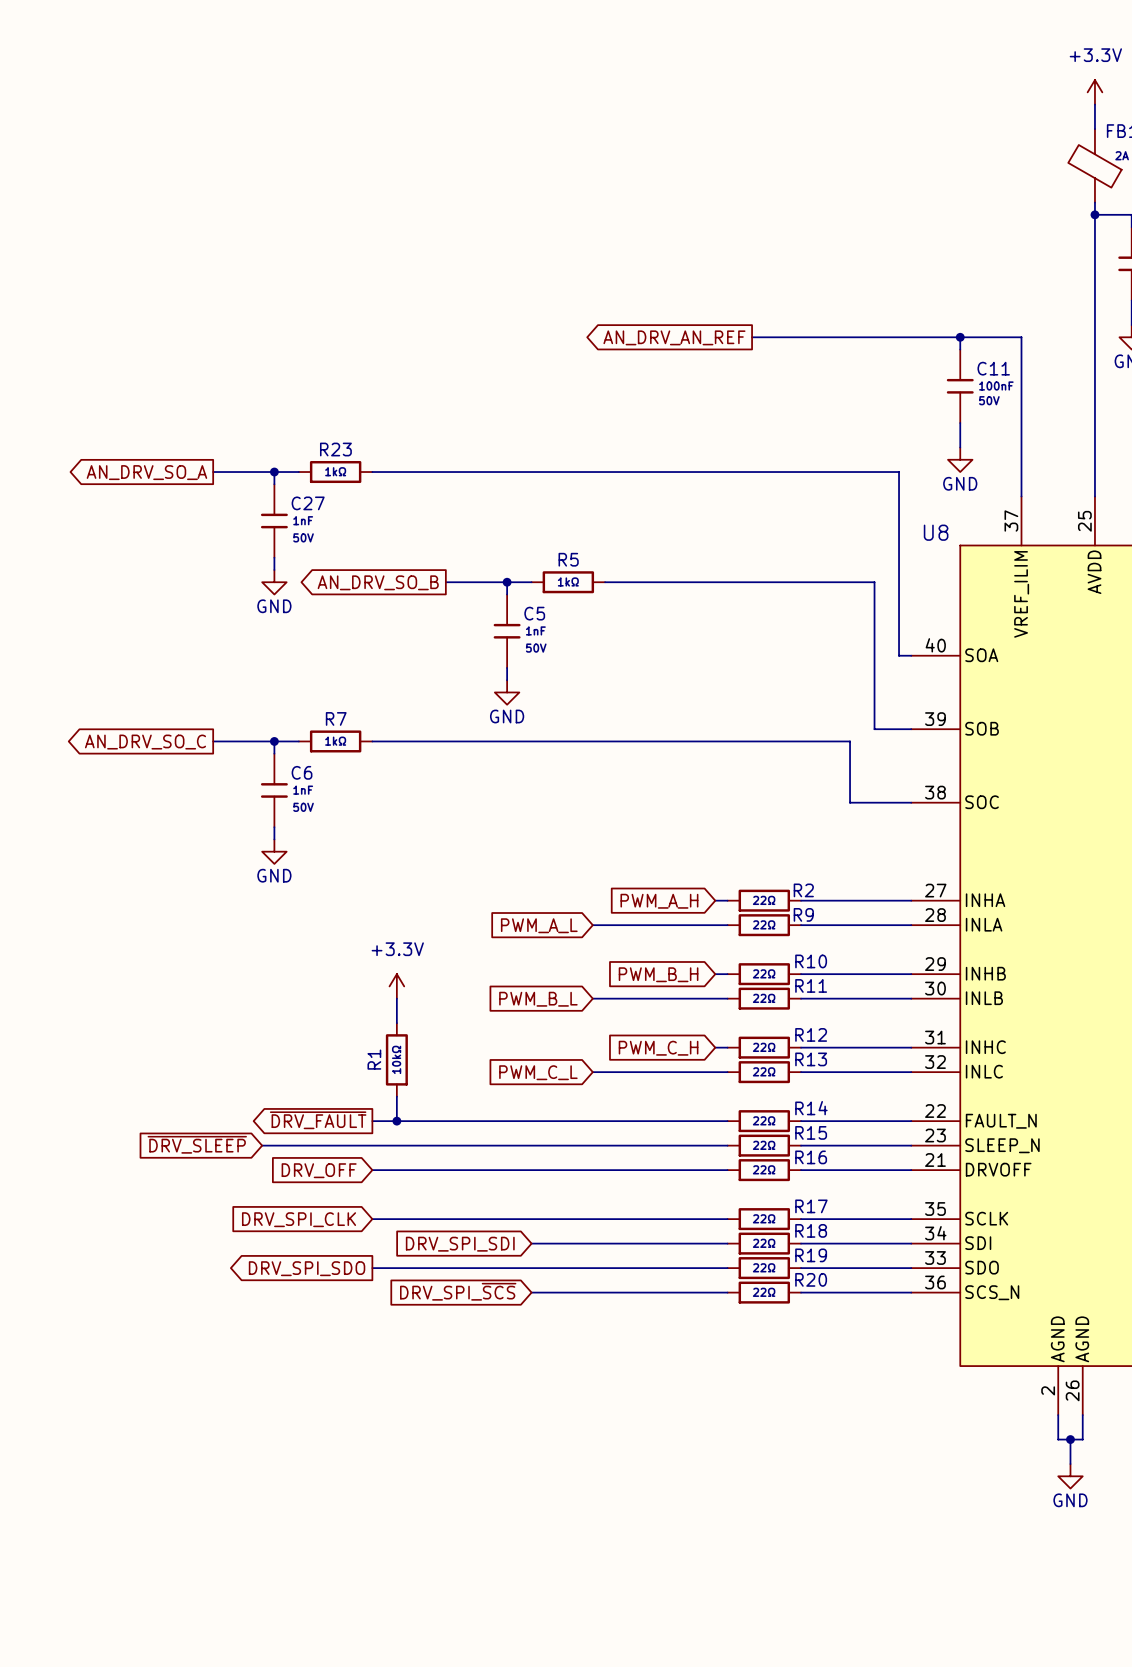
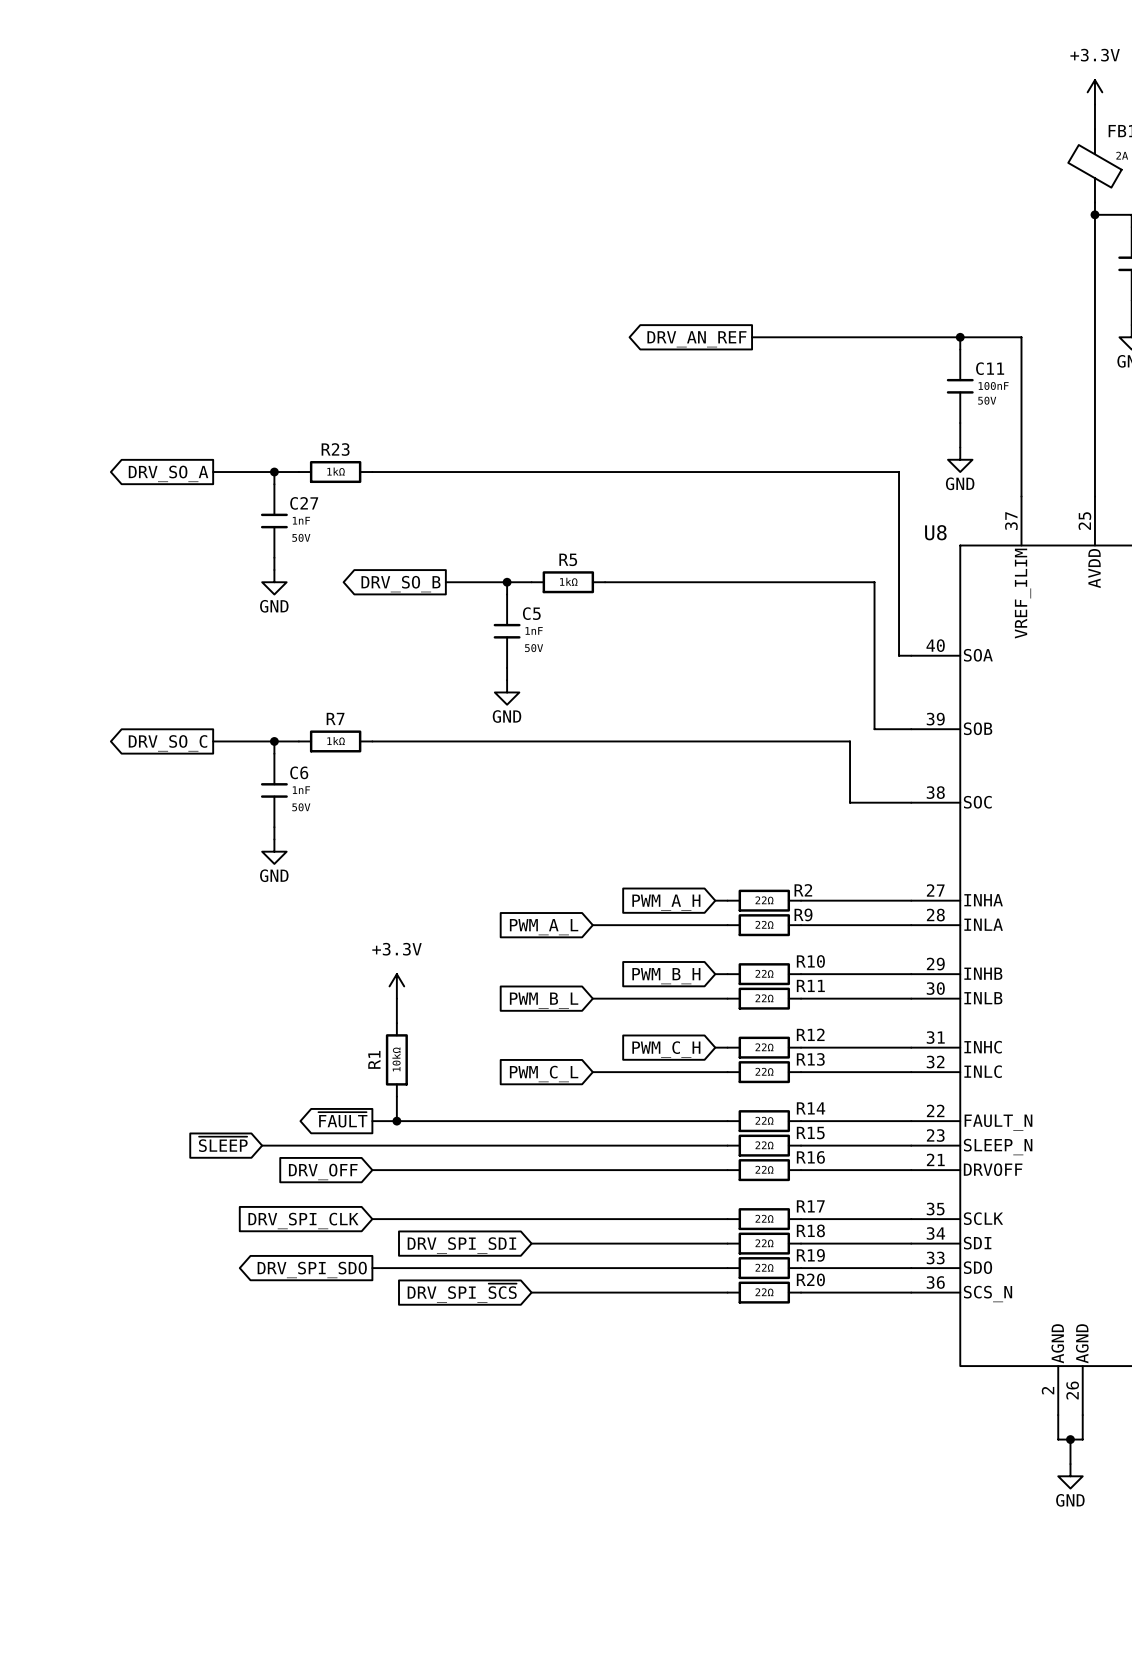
global label: AN_DRV_AN_REF (674, 337) -> DRV_AN_REF (696, 339)
global label: AN_DRV_SO_A (146, 472) -> DRV_SO_A (168, 473)
global label: AN_DRV_SO_B (378, 582) -> DRV_SO_B (400, 584)
global label: AN_DRV_SO_C (145, 742) -> DRV_SO_C (168, 743)
global label: ~{DRV_FAULT} (318, 1120) -> ~{FAULT} (342, 1119)
global label: ~{DRV_SLEEP} (197, 1144) -> ~{SLEEP} (223, 1144)

